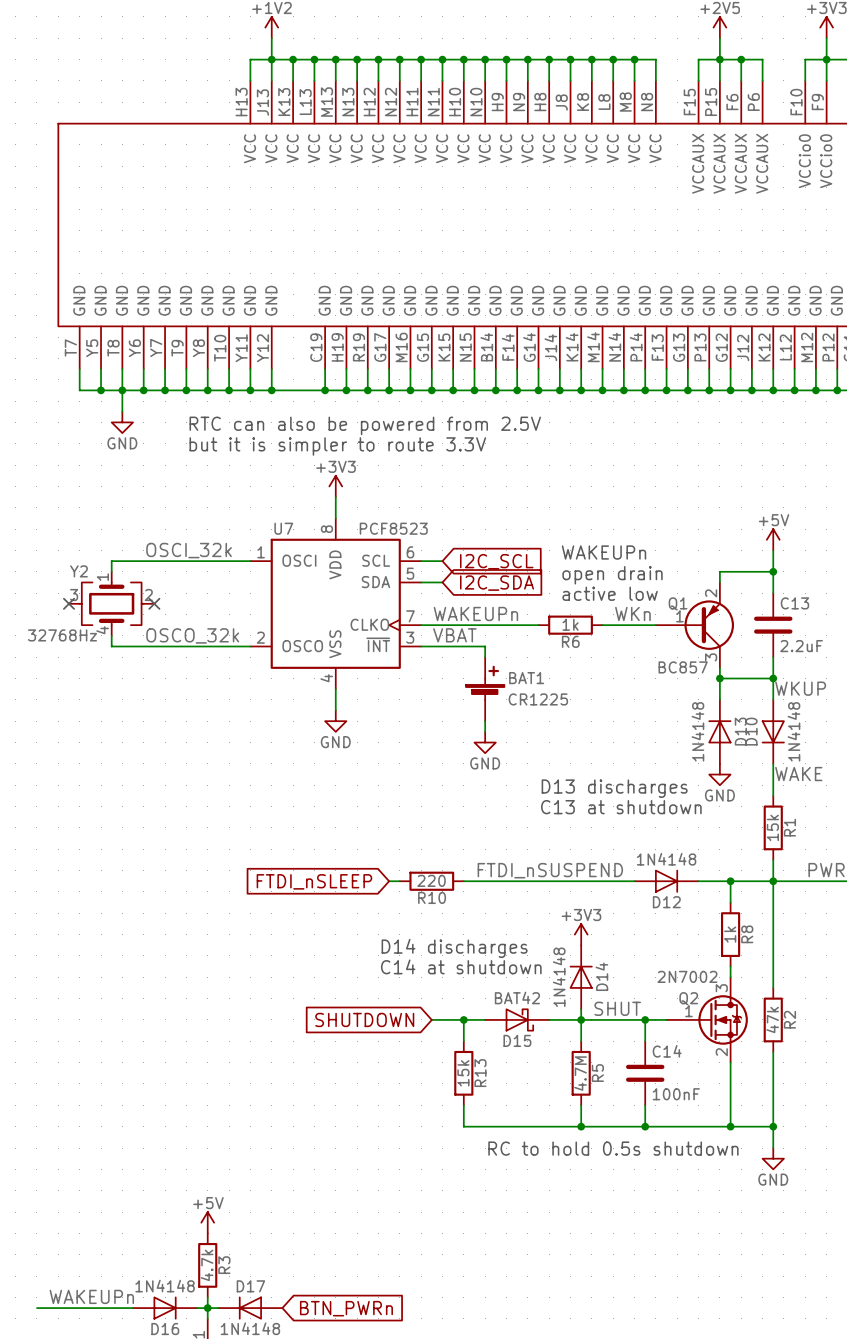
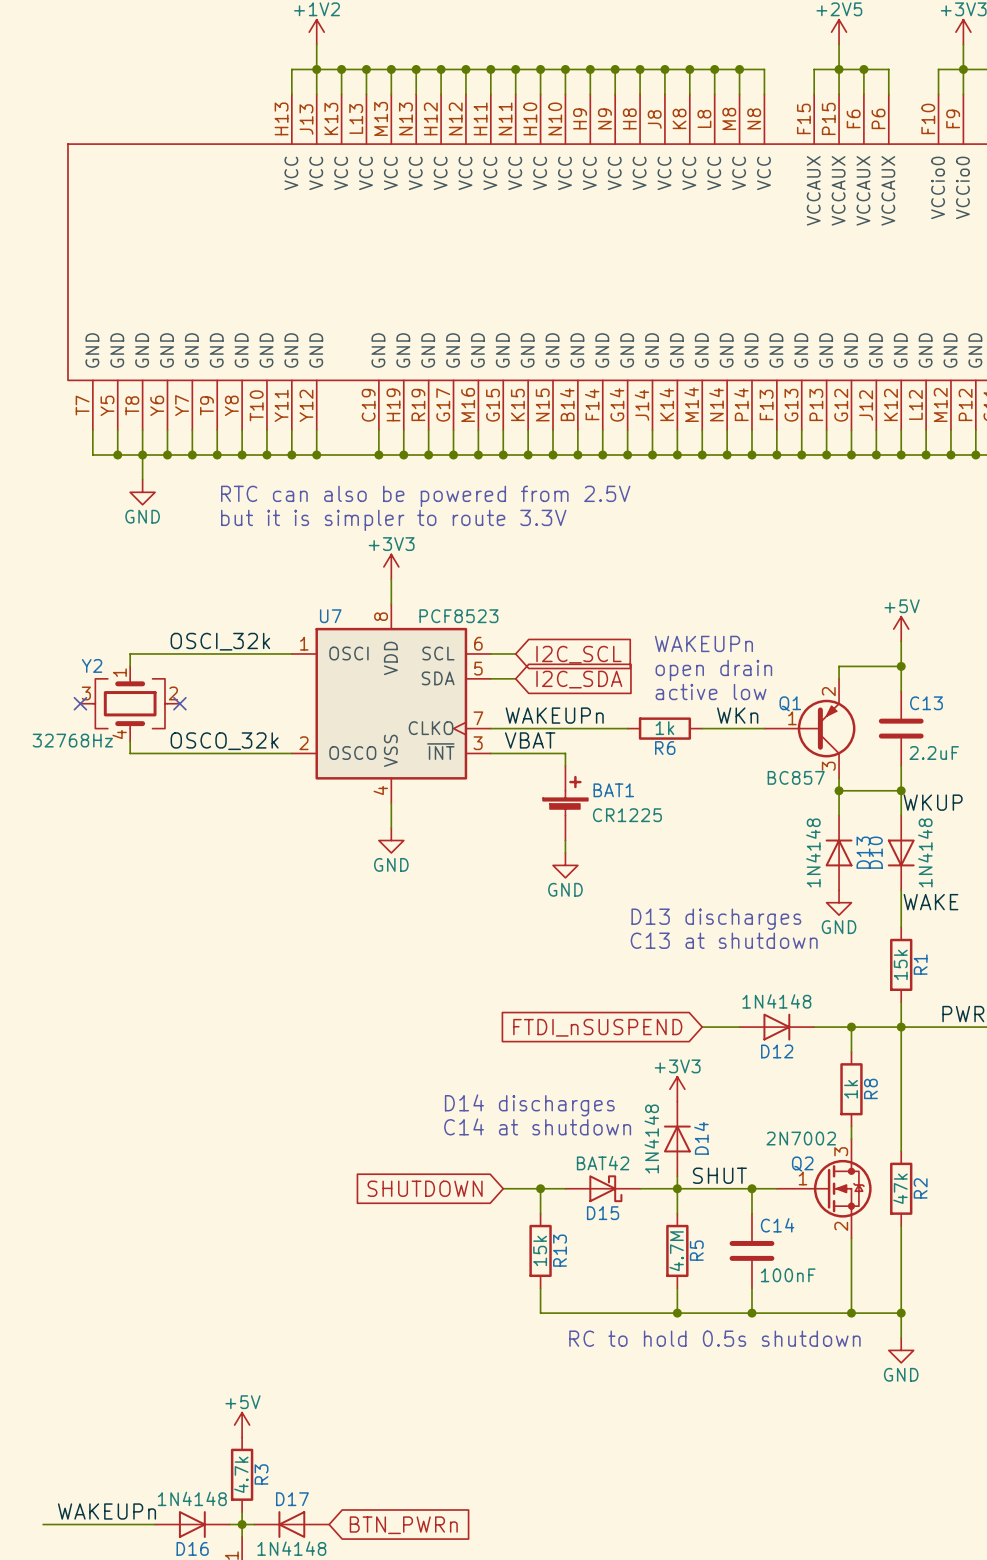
label: FTDI_nSUSPEND (550, 870) -> none
global label: FTDI_nSLEEP (314, 881) -> none
wire: (389, 881) (399, 881) -> none
R10: 220 (431, 881) -> none
wire: (463, 881) (602, 881) -> none
global label: none -> FTDI_nSUSPEND (597, 1027)

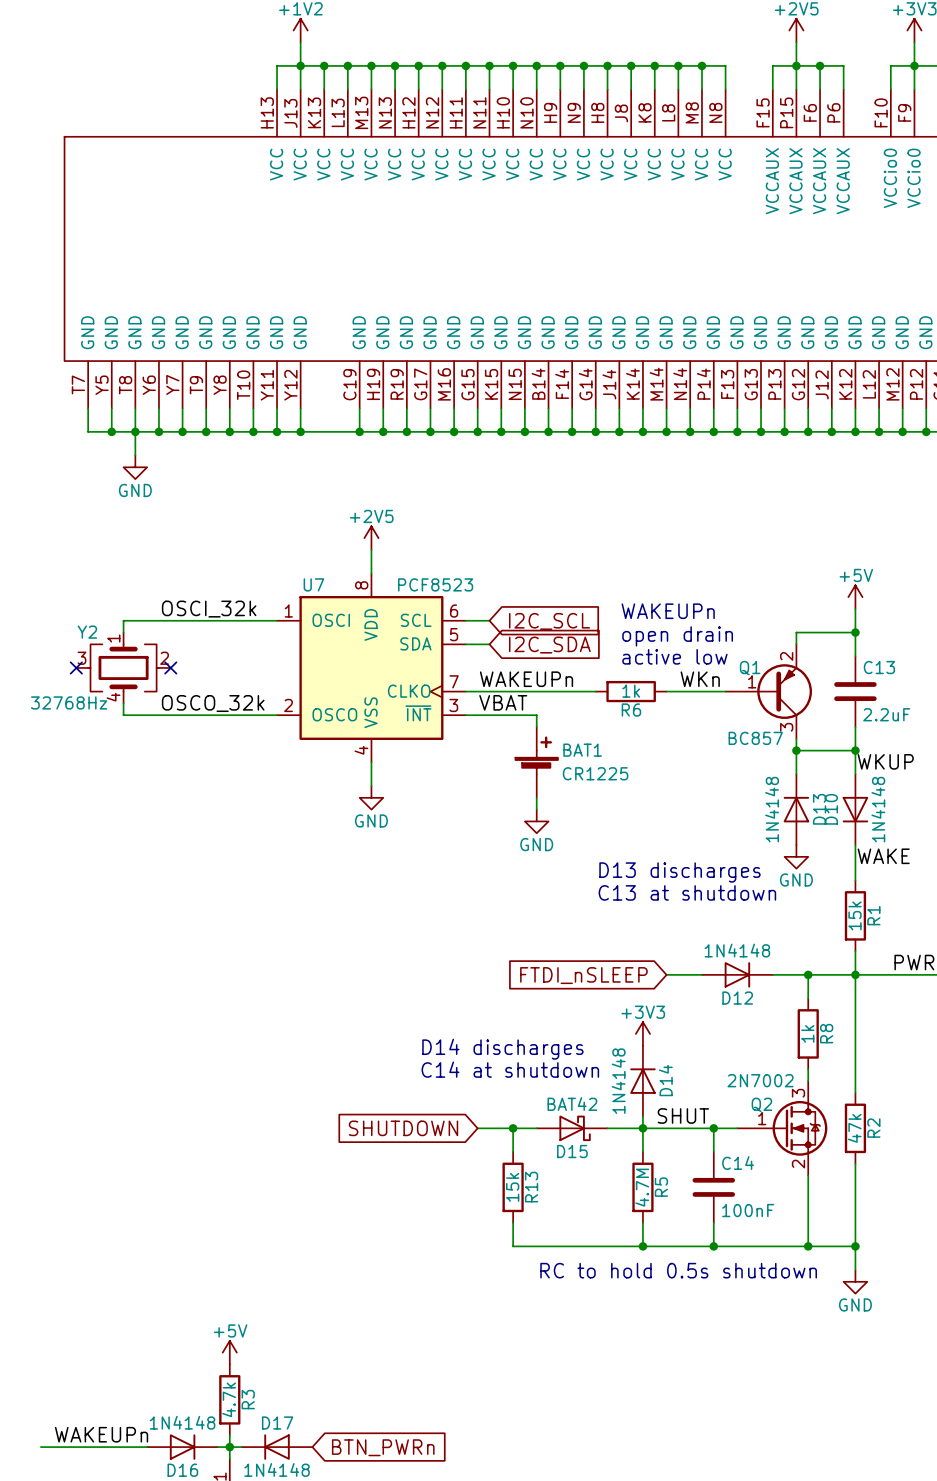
text: RTC can also be powered from 2.5V (425, 496) -> none
text: but it is simpler to route 3.3V (393, 520) -> none
power symbol: +3V3 (391, 566) -> +2V5 (371, 538)
global label: FTDI_nSUSPEND (597, 1027) -> FTDI_nSLEEP (583, 975)

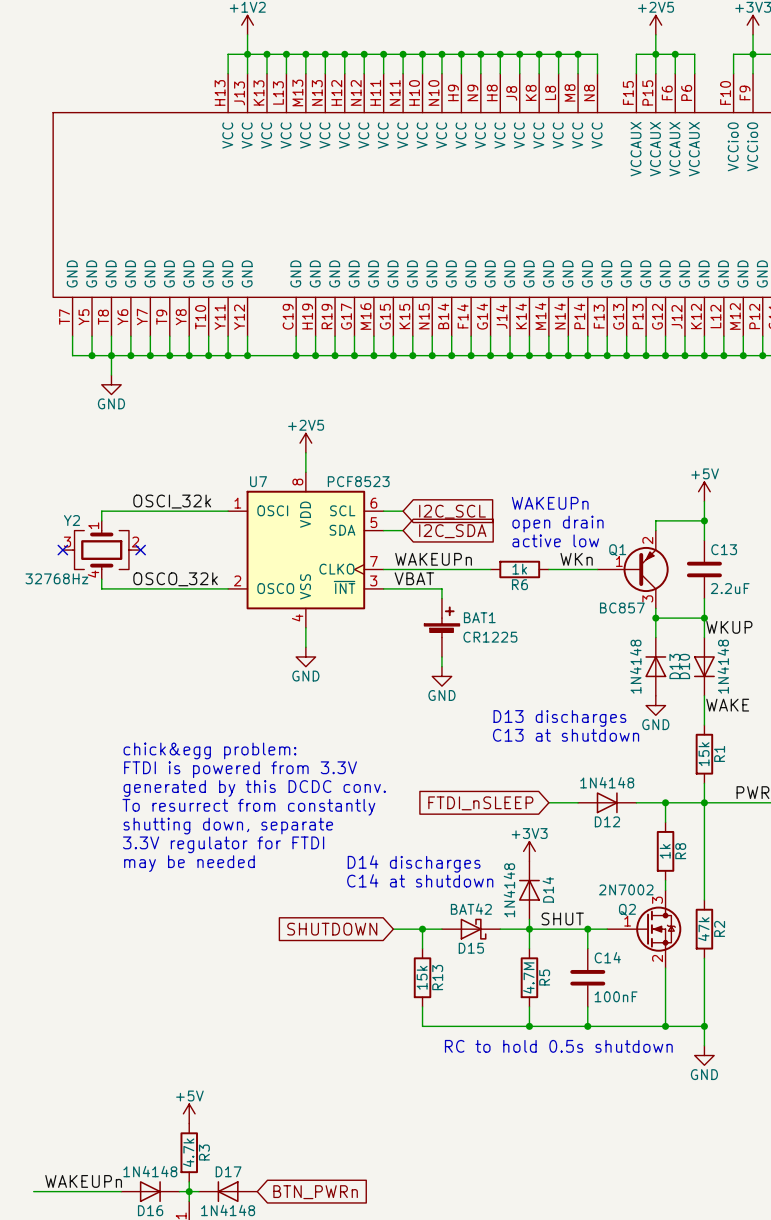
text: none -> chick&egg problem: (209, 750)
text: none -> FTDI is powered from 3.3V (240, 769)
text: none -> generated by this DCDC conv. (254, 788)
text: none -> To resurrect from constantly (248, 807)
text: none -> shutting down, separate (228, 826)
text: none -> 3.3V regulator for FTDI (223, 844)
text: none -> may be needed (189, 863)

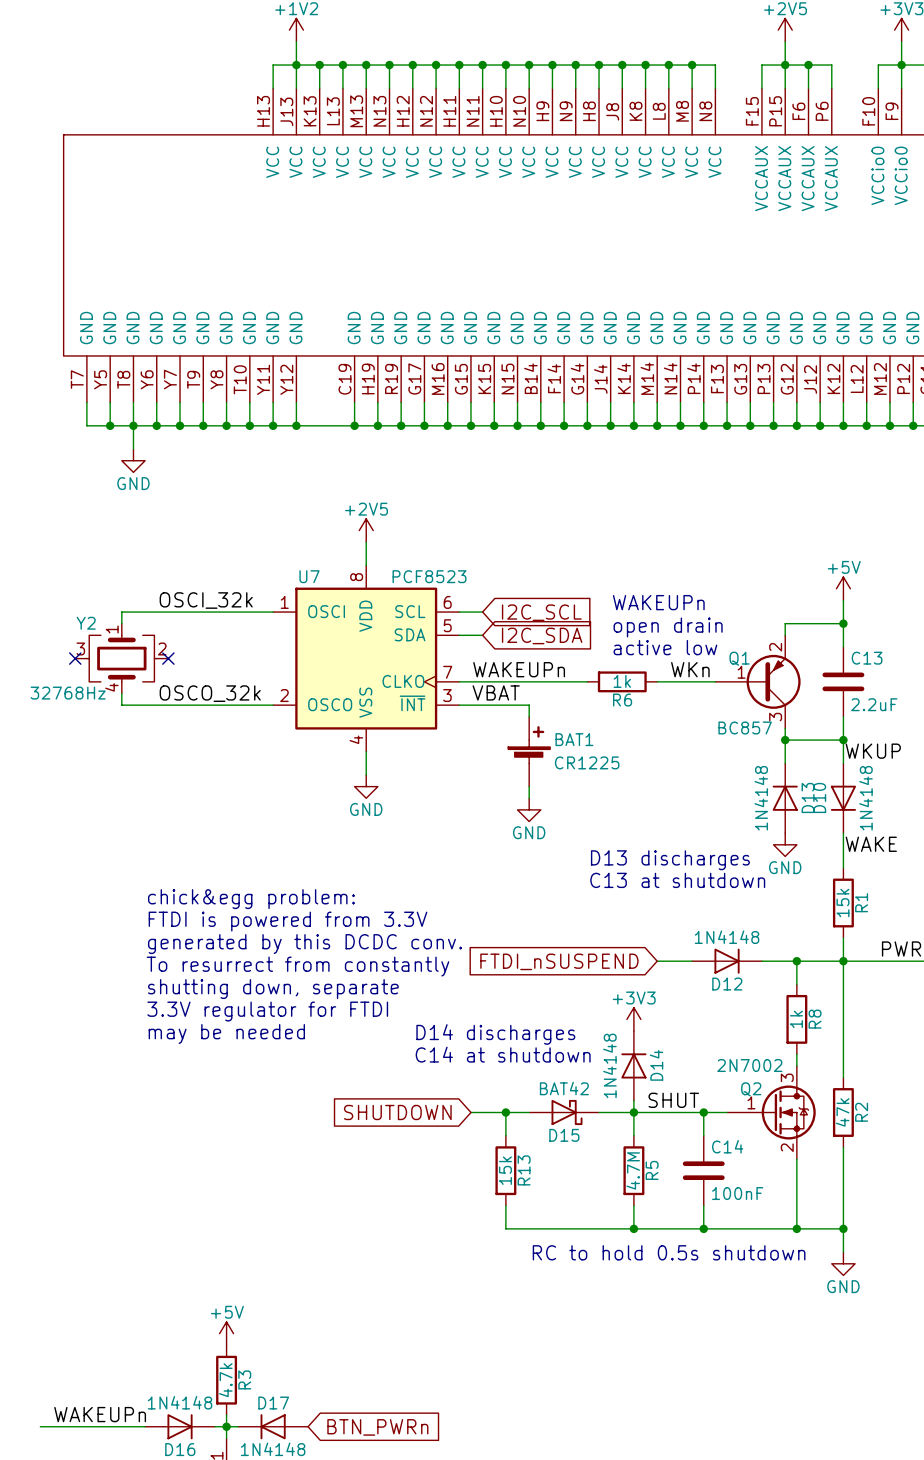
global label: FTDI_nSLEEP (480, 803) -> FTDI_nSUSPEND (559, 961)

